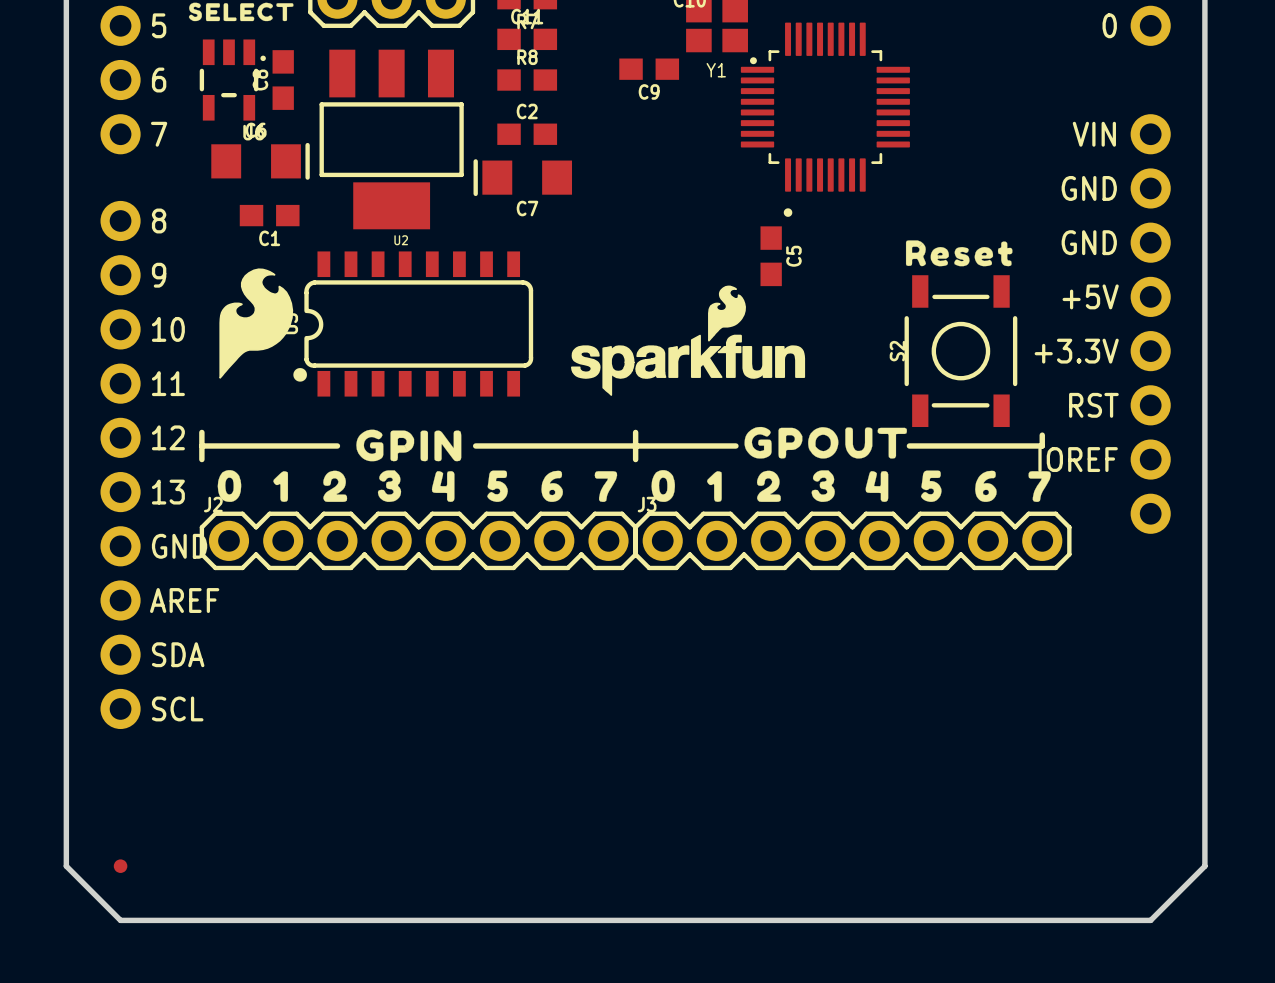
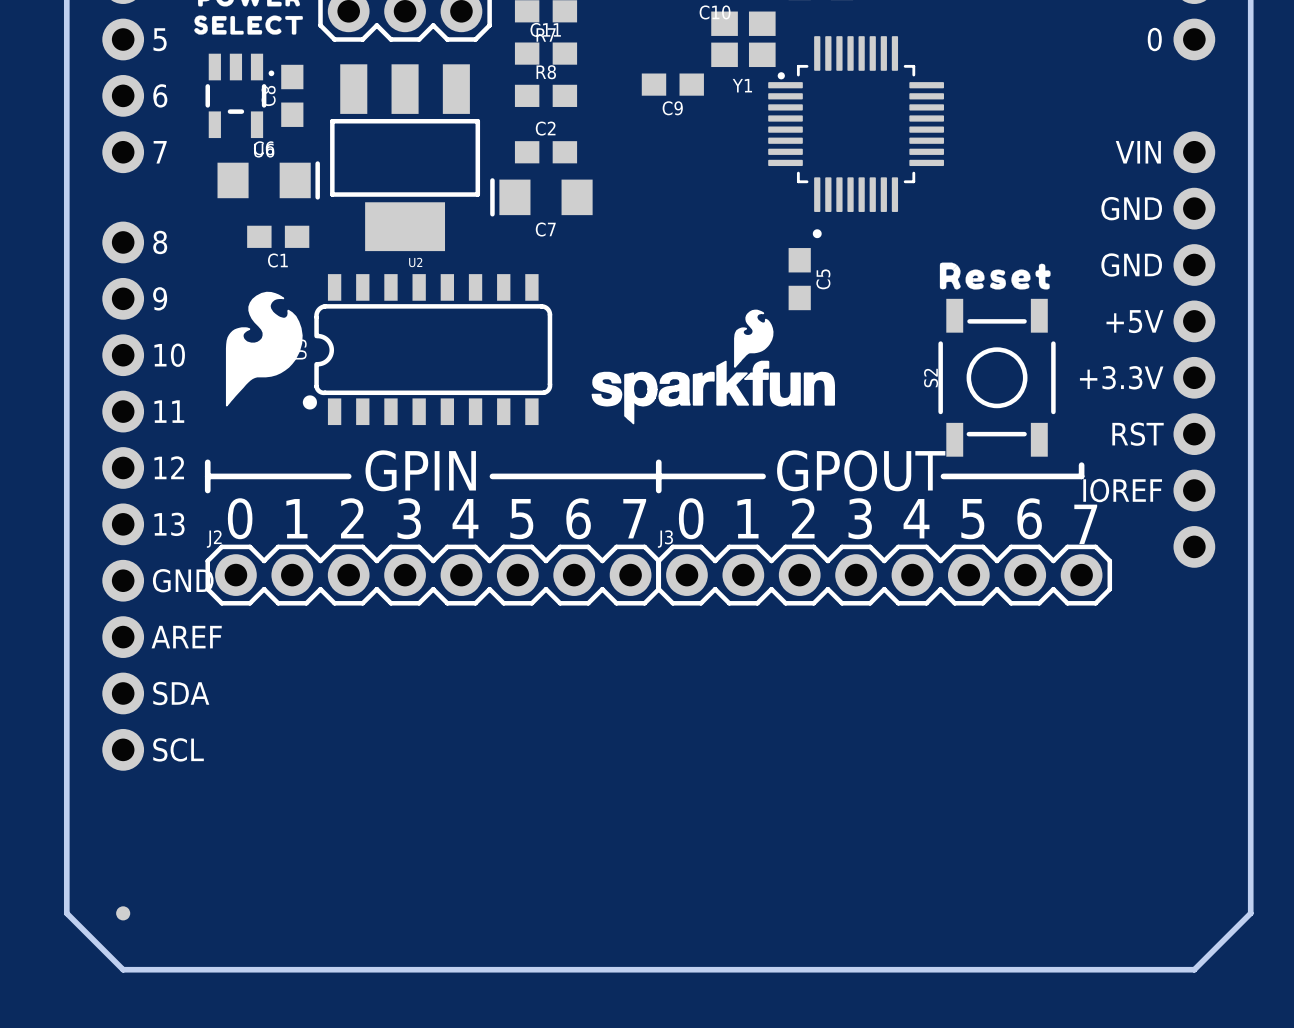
drawing: [744, 426, 942, 502] -> none
drawing: [323, 429, 462, 502] -> none
text: none -> GPIN (420, 470)
text: none -> GPOUT (861, 470)
drawing: [217, 470, 242, 502] -> none
drawing: [487, 470, 508, 502] -> none
drawing: [541, 470, 563, 502] -> none
drawing: [651, 470, 675, 502] -> none
drawing: [975, 470, 997, 502] -> none
drawing: [273, 471, 289, 502] -> none
drawing: [594, 471, 618, 502] -> none
drawing: [707, 471, 722, 502] -> none
drawing: [1028, 471, 1051, 502] -> none
text: none -> 4 (465, 518)
text: none -> 4 (916, 518)
text: none -> 0 (240, 518)
text: none -> 1 (296, 518)
text: none -> 2 (352, 518)
text: none -> 3 (409, 518)
text: none -> 5 (521, 519)
text: none -> 6 (578, 518)
text: none -> 7 (634, 518)
text: none -> 0 (691, 518)
text: none -> 1 (747, 518)
text: none -> 2 (803, 518)
text: none -> 3 (860, 518)
text: none -> 5 (972, 519)
text: none -> 6 (1029, 518)
text: none -> 7 (1085, 524)

